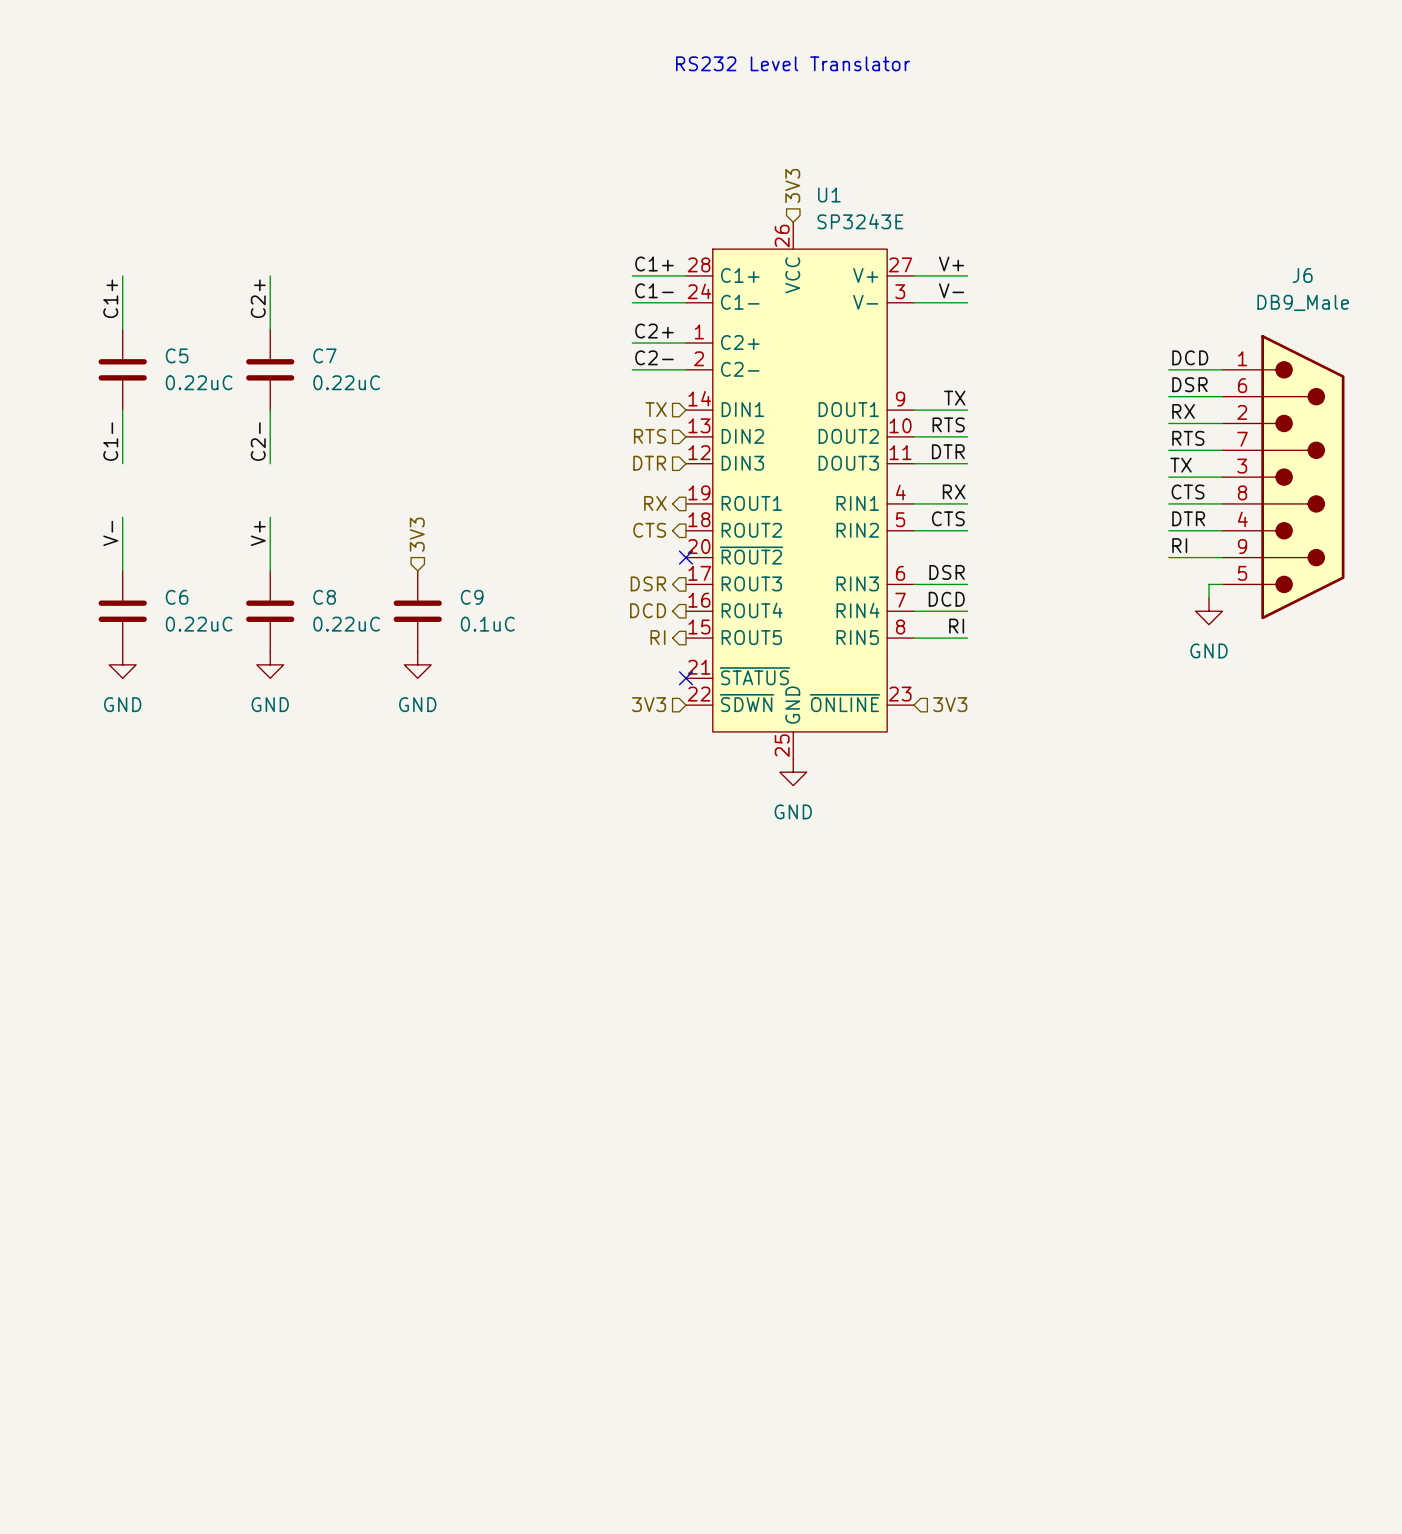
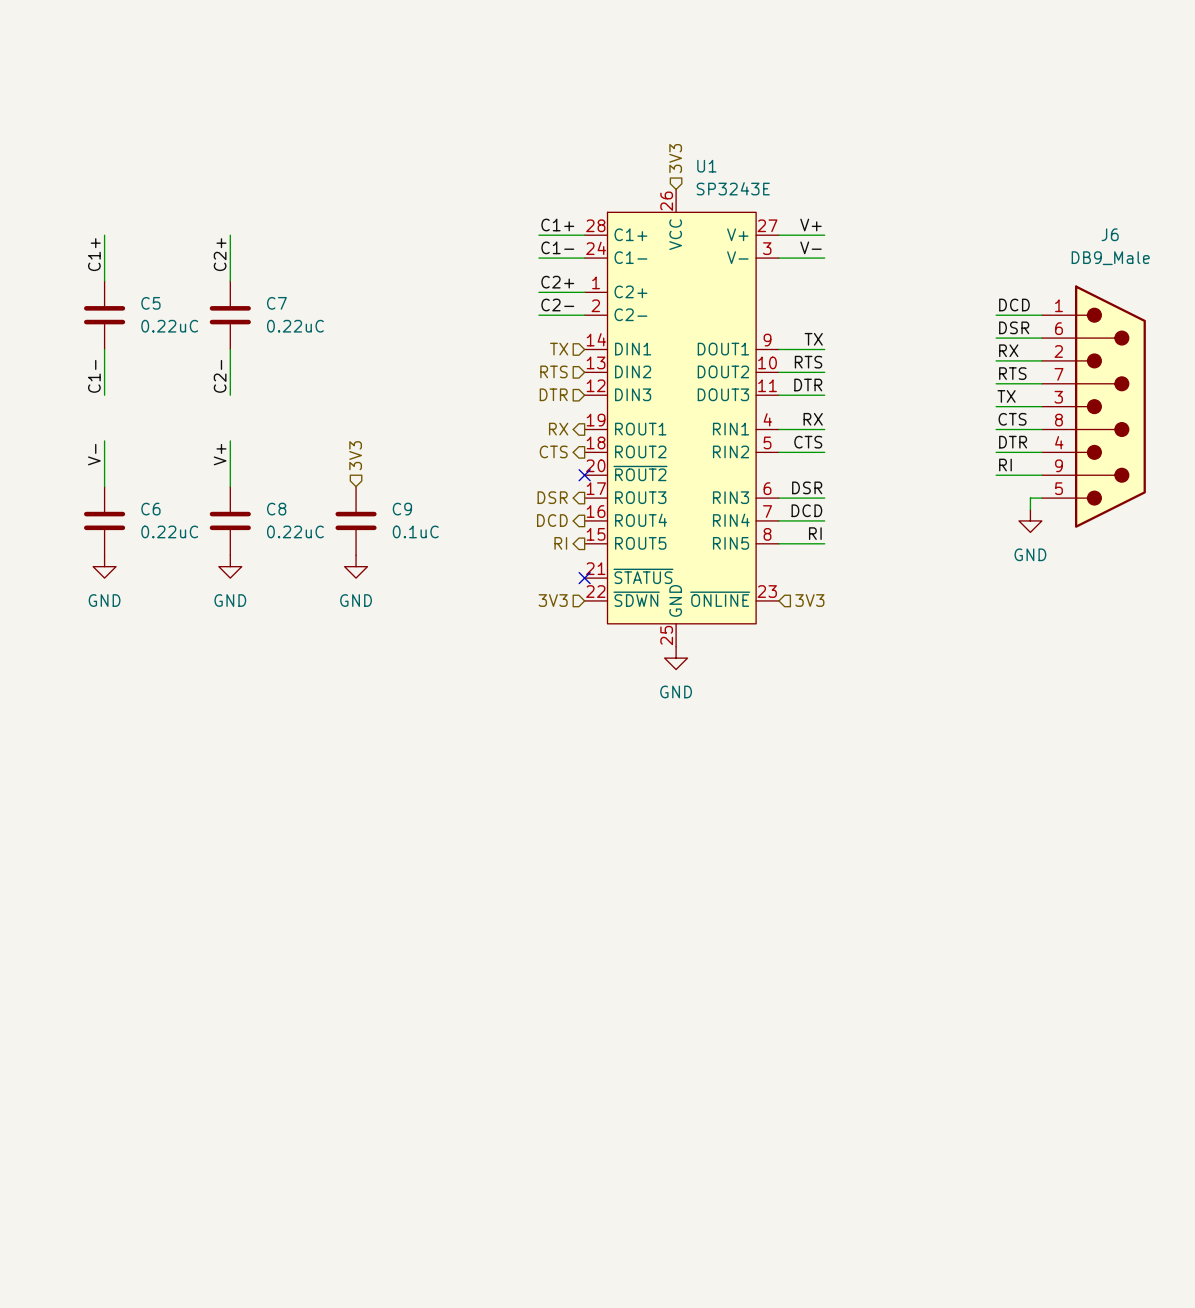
text: RS232 Level Translator (793, 63) -> none

